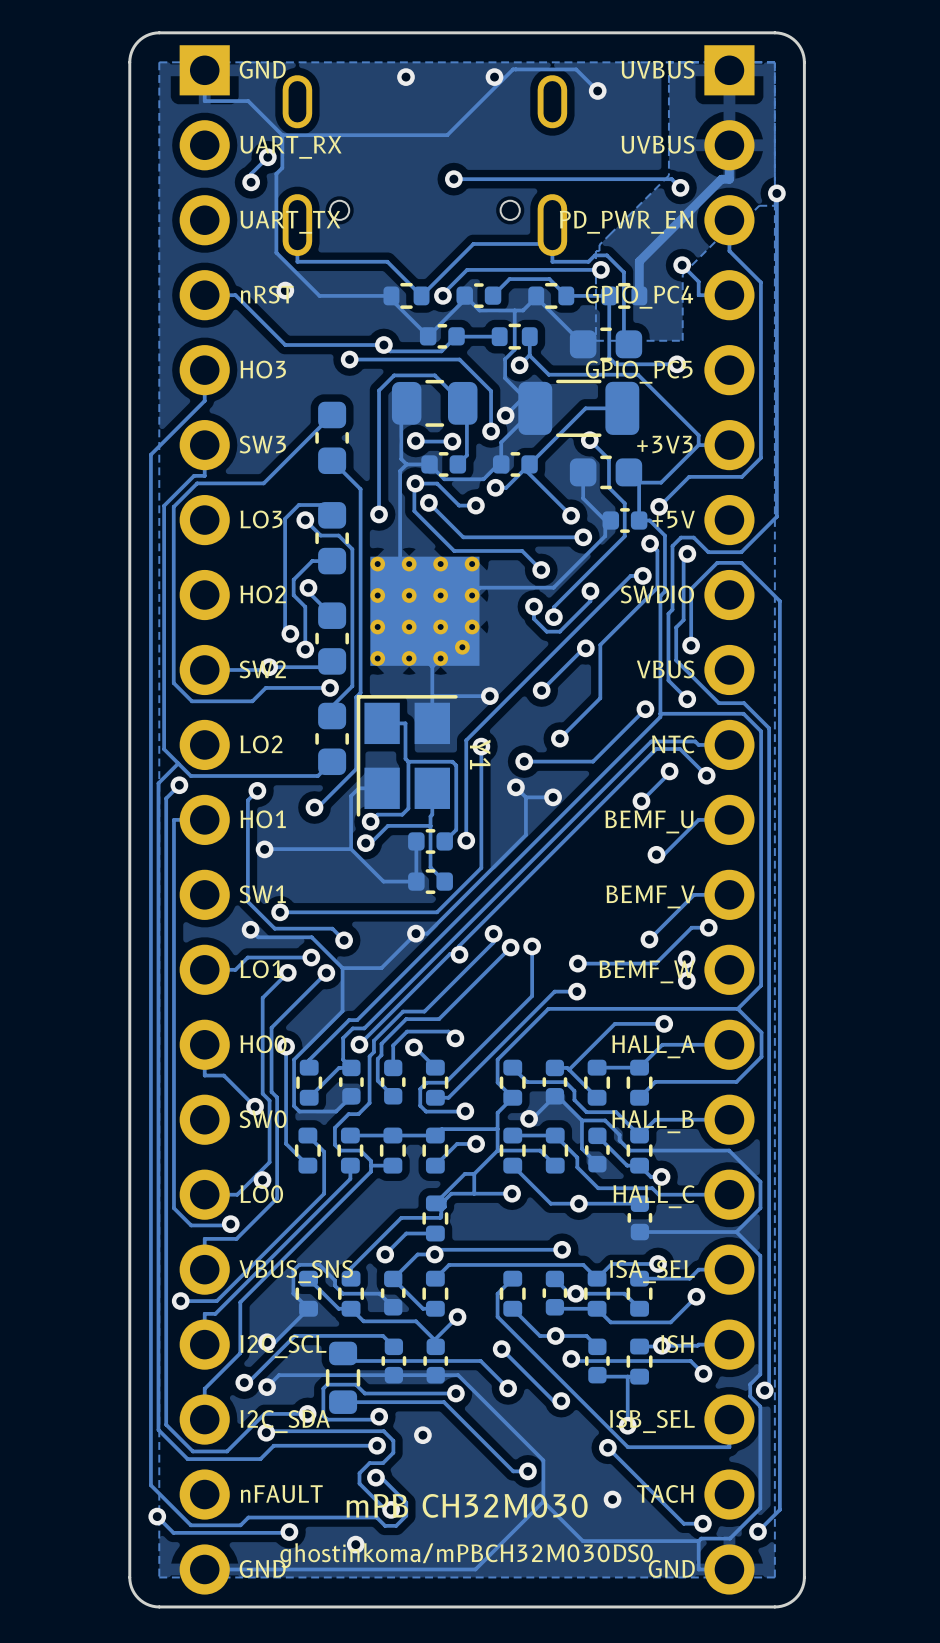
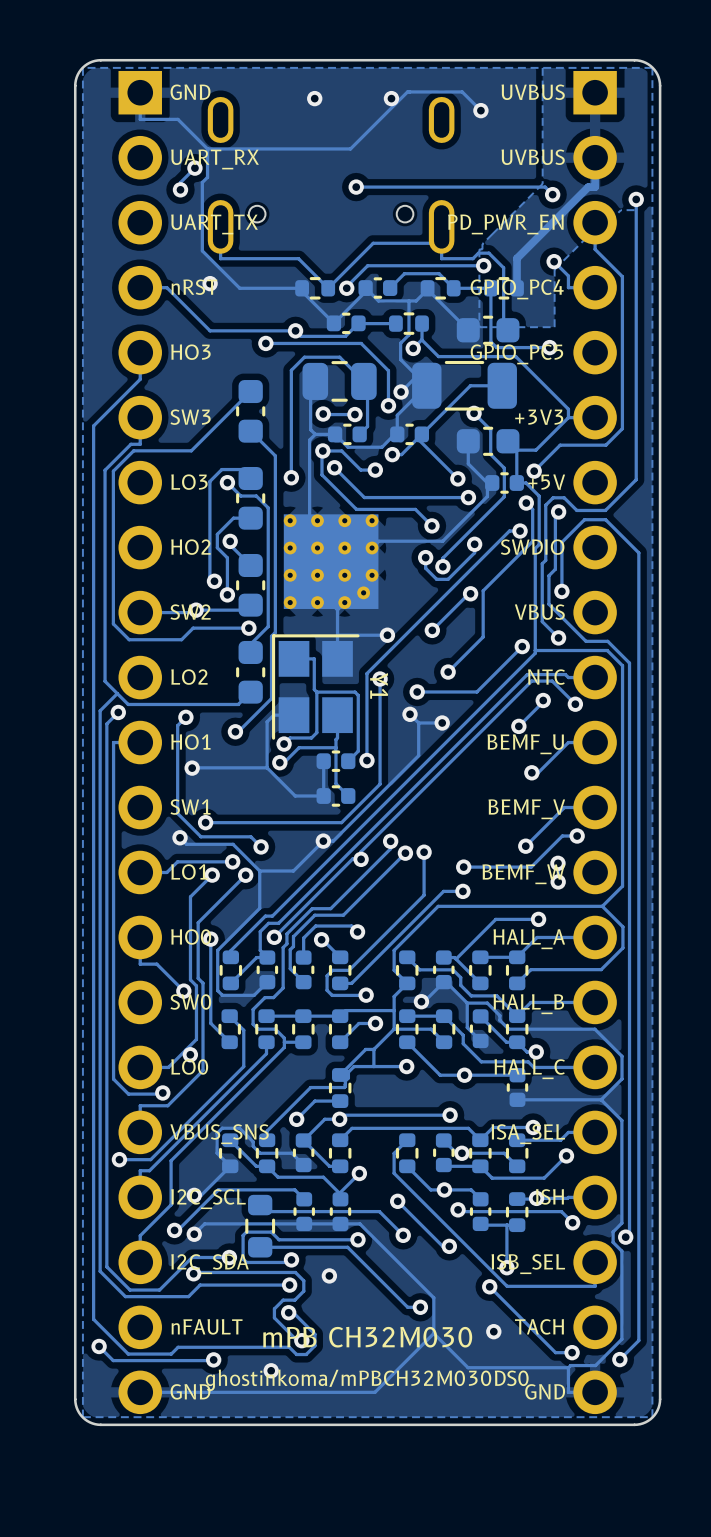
zone outline: none -> (542, 67) (542, 85)
zone outline: (774, 62) (774, 1577) (159, 1577) (159, 62) (774, 62) -> (652, 67) (652, 1417) (82, 1417) (82, 67) (652, 67)

